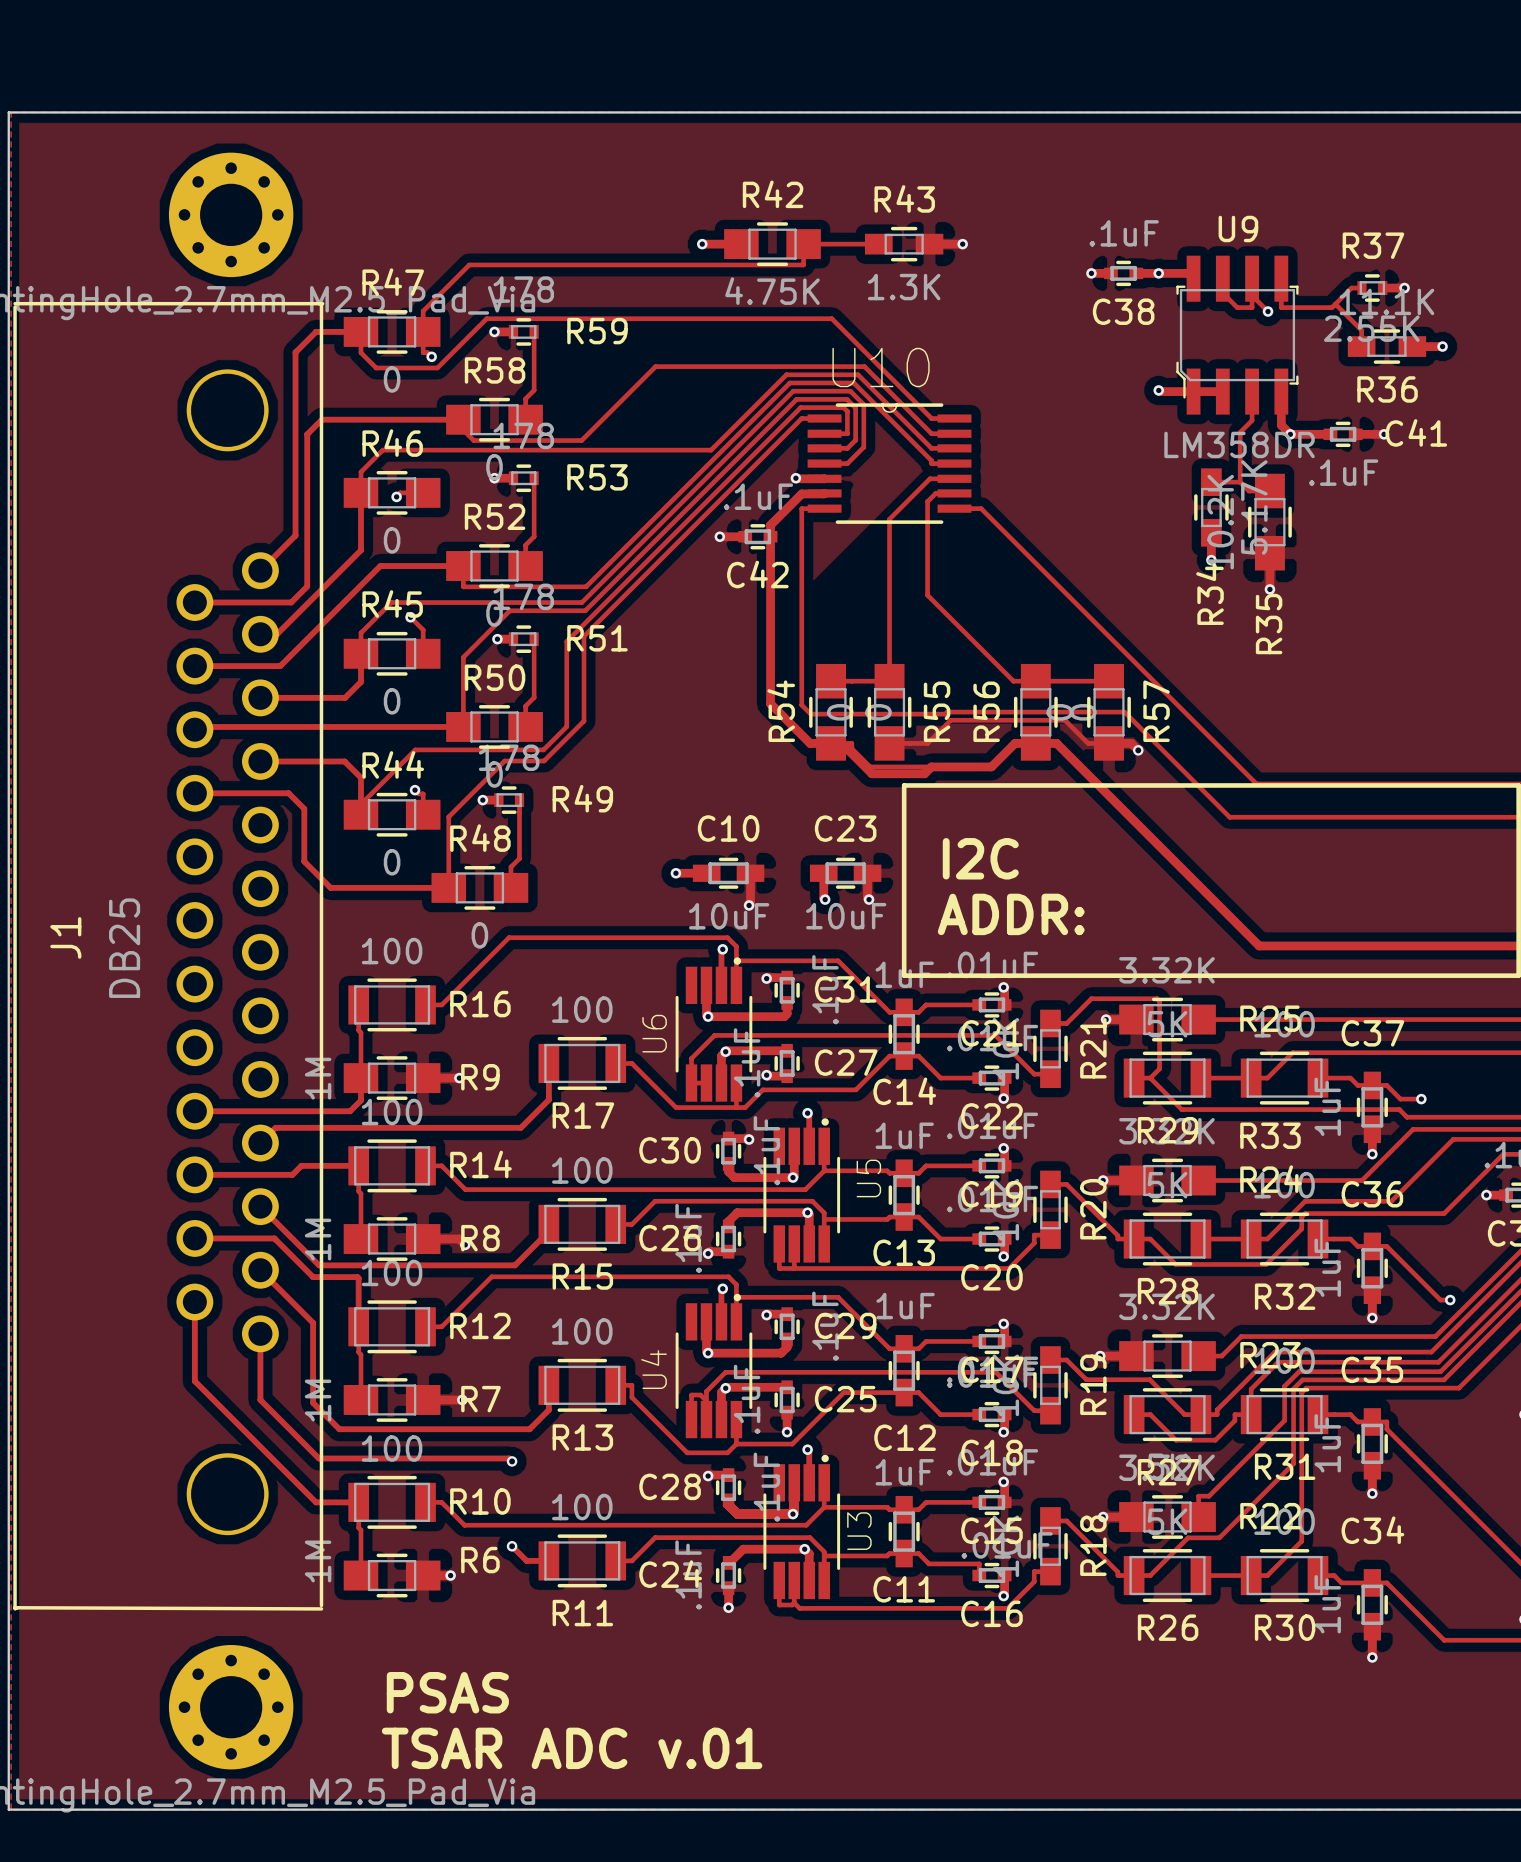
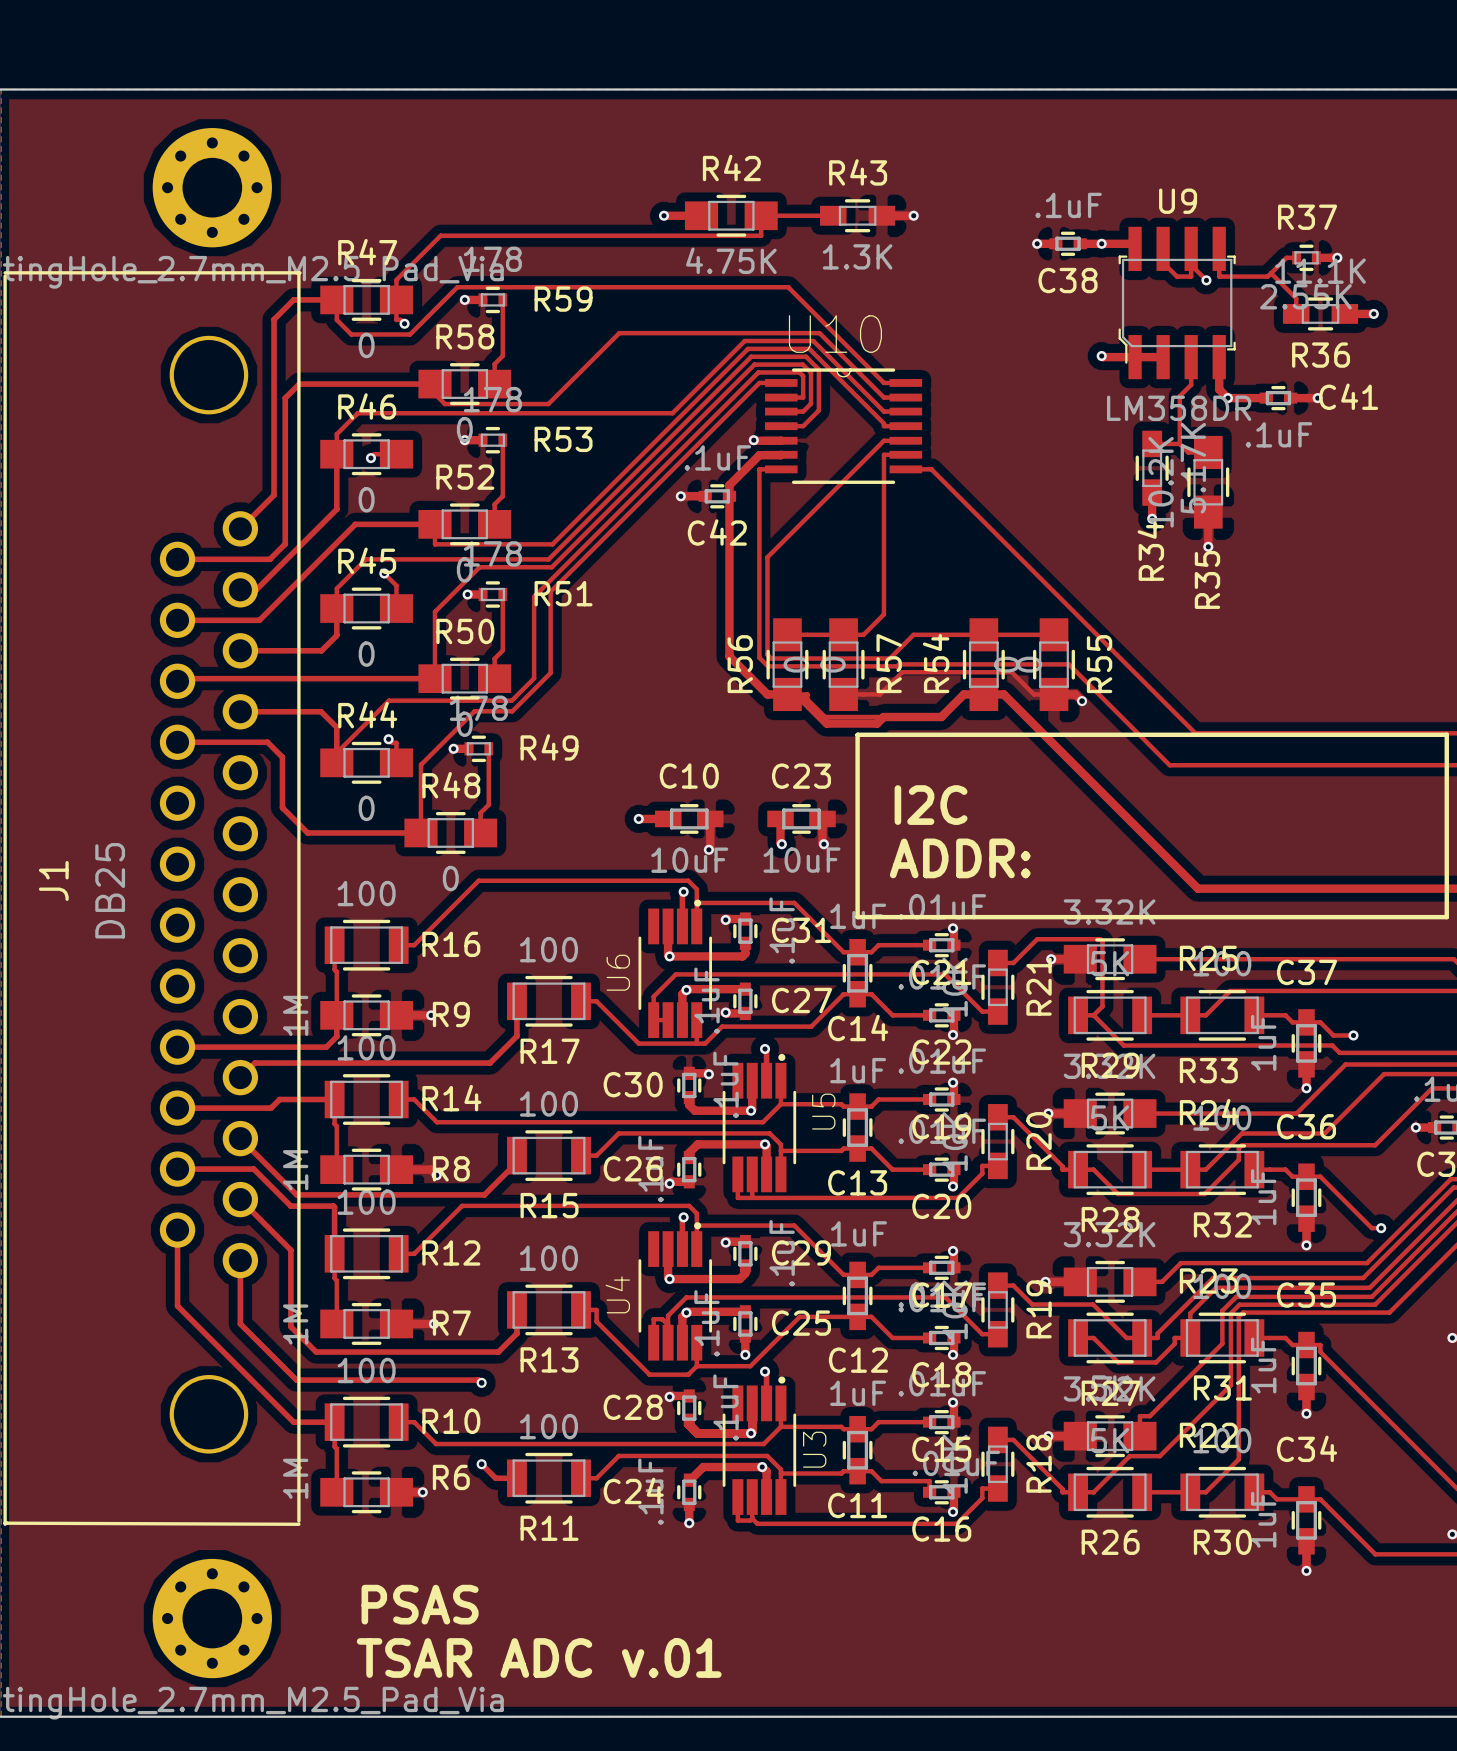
track: (931, 478) (889, 519) (889, 681) -> (887, 454) (883, 454) (883, 614) (863, 634) (843, 634)
track: (935, 493) (927, 501) (927, 595) (1013, 681) -> (883, 440) (767, 557) (767, 654) (771, 658) (889, 658) (913, 634) (962, 634)
R54 name: R54 (781, 711) -> R56 (740, 664)
R55 name: R55 (937, 711) -> R57 (889, 663)
R56 name: R56 (986, 711) -> R54 (936, 663)
R57 name: R57 (1156, 711) -> R55 (1099, 664)

